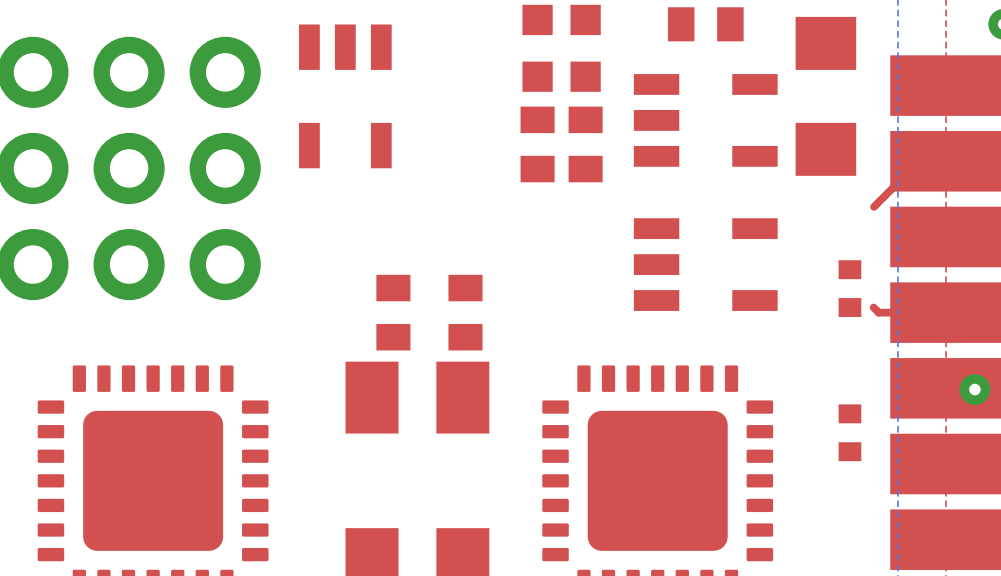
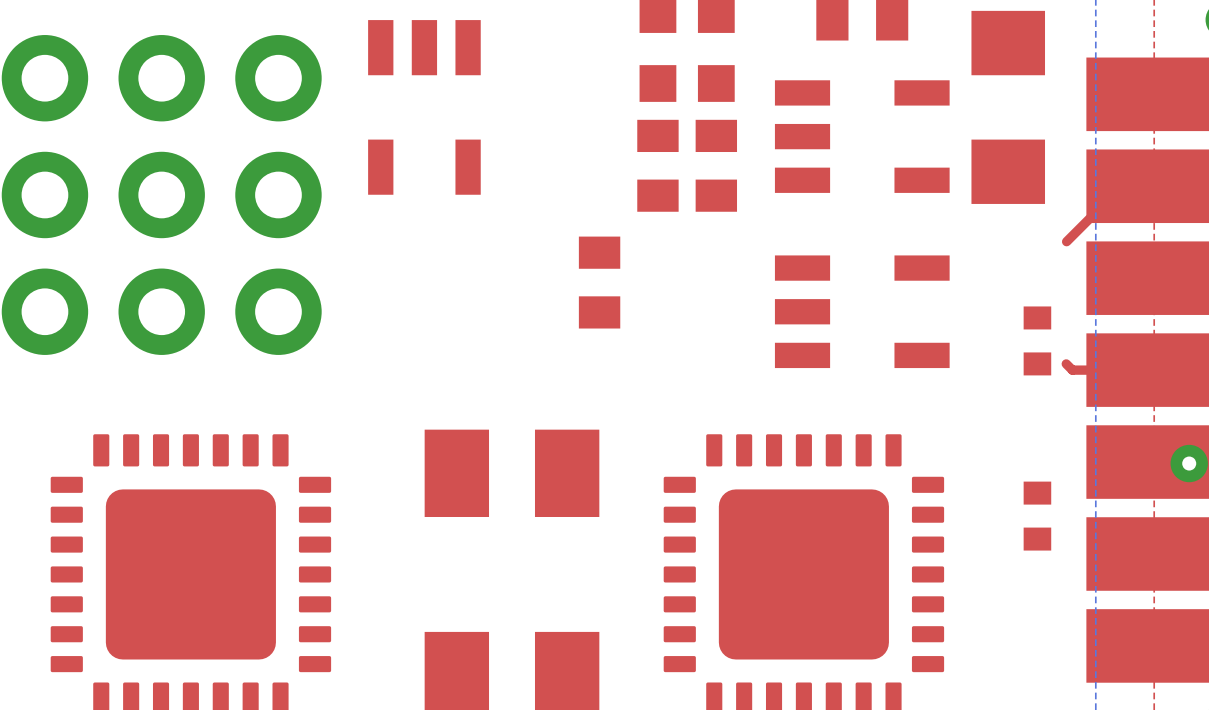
part: none -> (599, 282)
part: (393, 312) -> none
part: (465, 312) -> none

